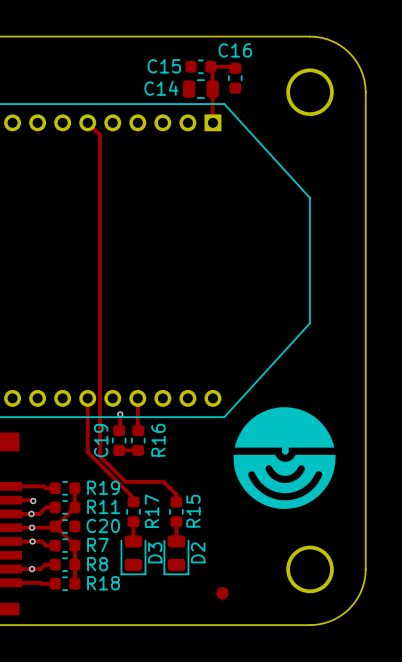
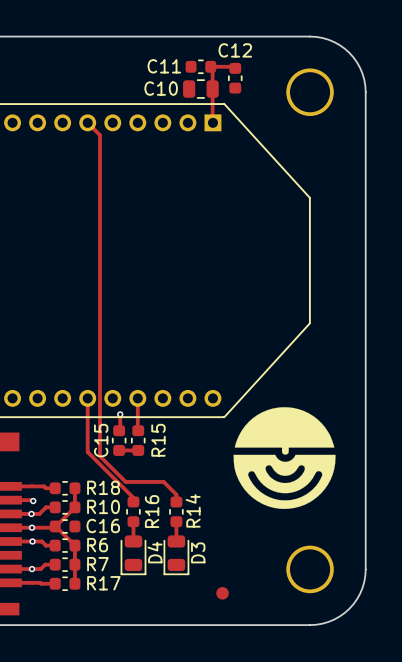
C16 name: C16 (235, 50) -> C12 (235, 50)
C15 name: C15 (164, 66) -> C11 (164, 66)
C14 name: C14 (161, 88) -> C10 (161, 88)
C19 name: C19 (101, 440) -> C15 (101, 440)
R16 name: R16 (158, 440) -> R15 (158, 440)
R19 name: R19 (103, 487) -> R18 (103, 487)
R11 name: R11 (103, 506) -> R10 (103, 506)
R17 name: R17 (152, 511) -> R16 (152, 511)
R15 name: R15 (193, 511) -> R14 (193, 510)
C20 name: C20 (103, 526) -> C16 (103, 526)
R7 name: R7 (97, 545) -> R6 (97, 545)
D3 name: D3 (155, 552) -> D4 (154, 552)
D2 name: D2 (198, 552) -> D3 (198, 552)
R8 name: R8 (97, 564) -> R7 (97, 564)
R18 name: R18 (103, 583) -> R17 (103, 583)

